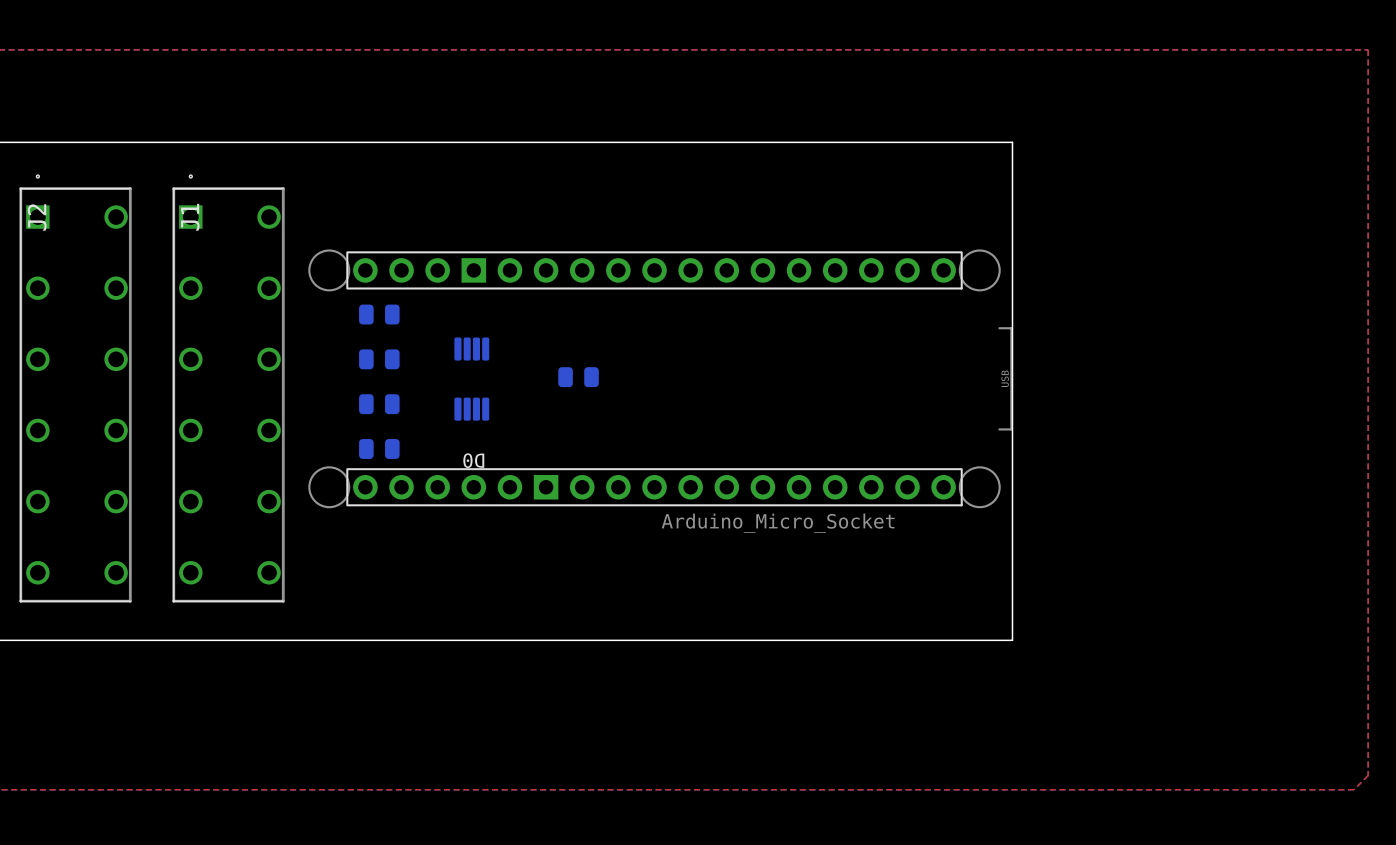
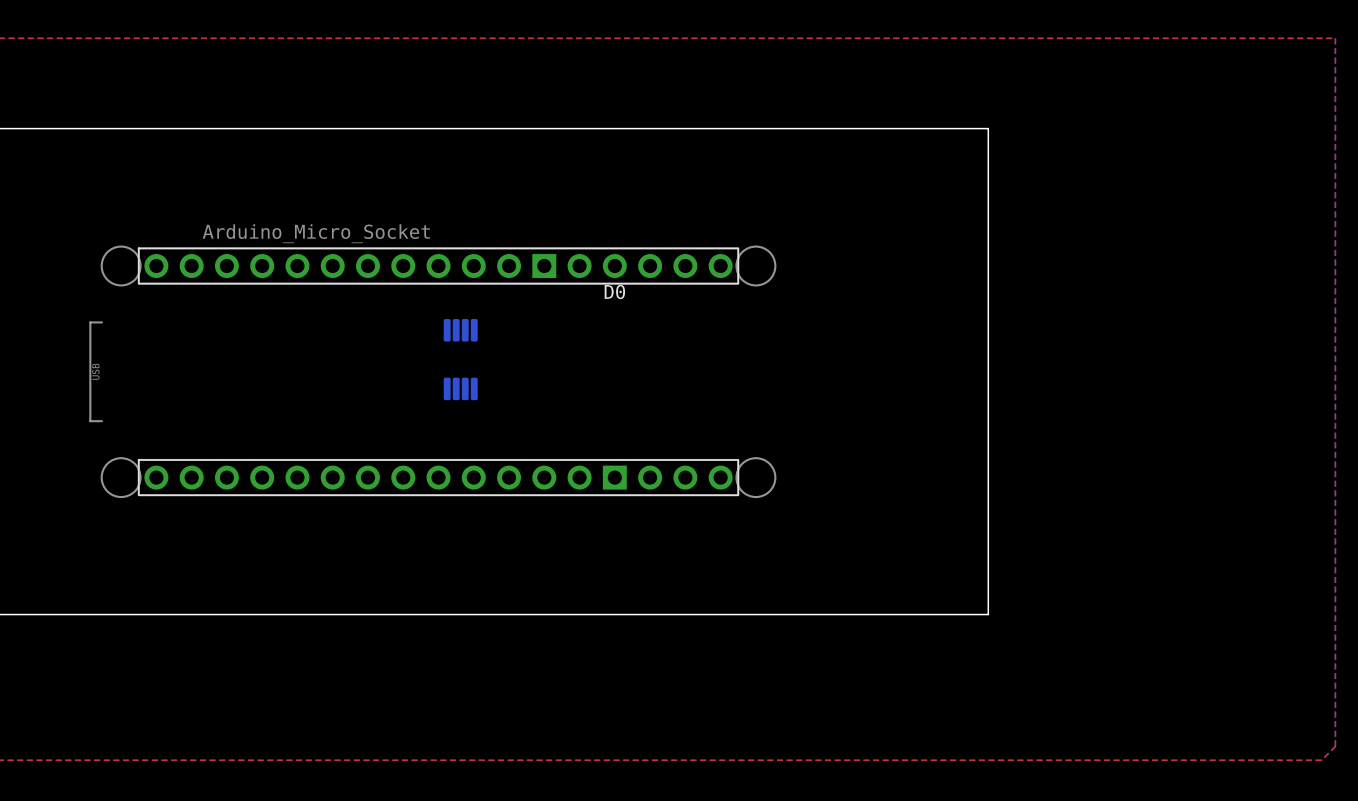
part: (379, 314) -> none
part: (379, 359) -> none
part: (578, 377) -> none
part rotation: 0° (660, 378) -> 180° (432, 371)
J2: (75, 388) -> none
J1: (228, 388) -> none
part: (379, 404) -> none
part: (379, 448) -> none

